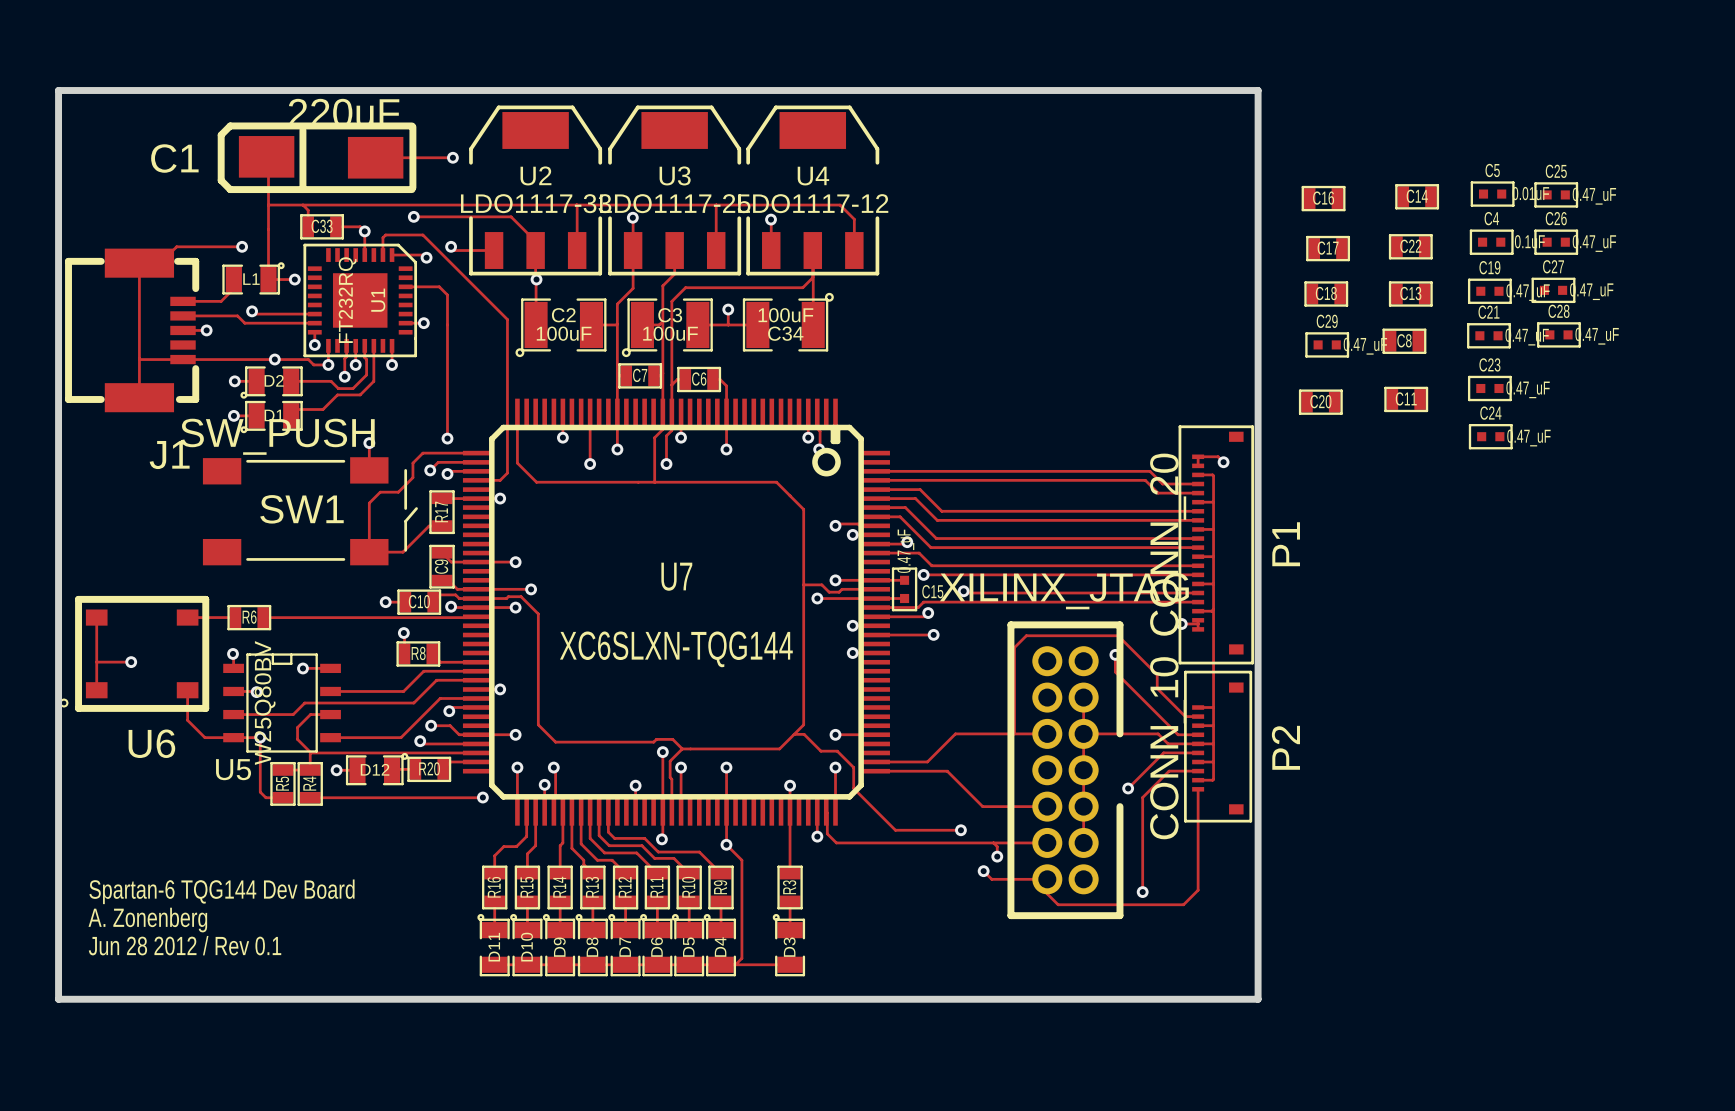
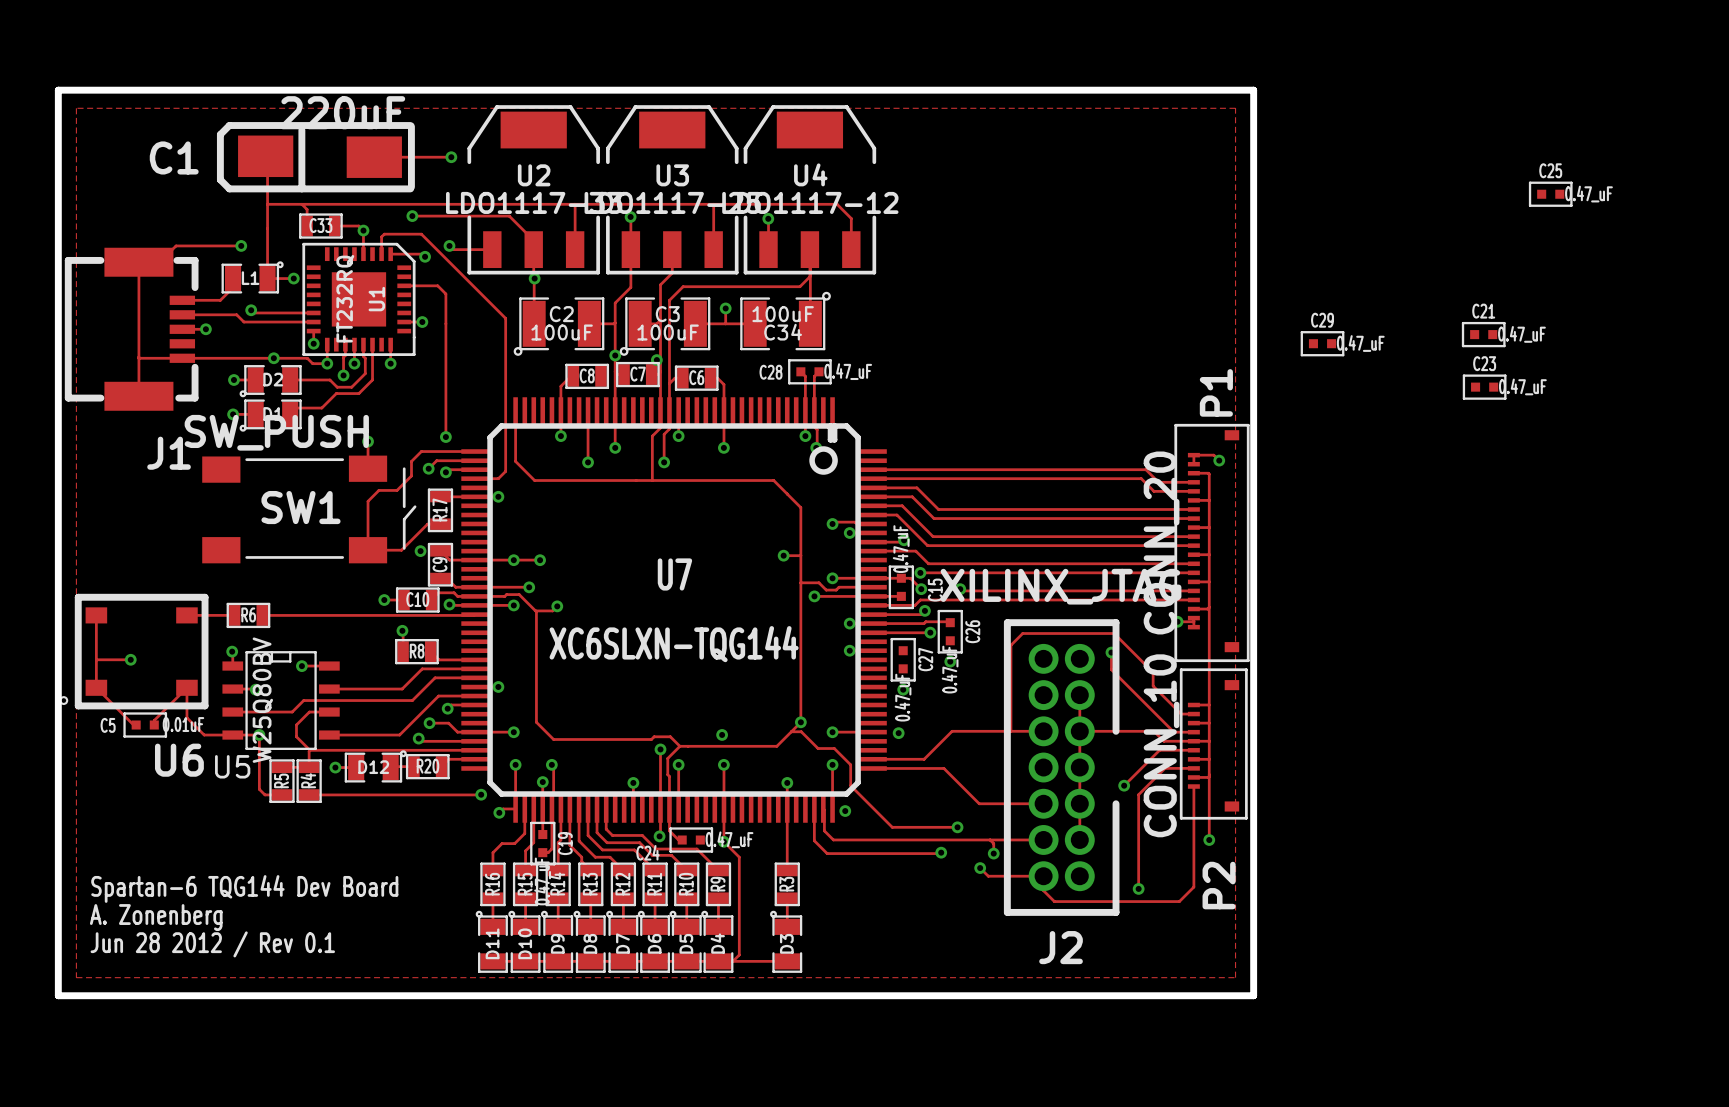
zone outline: none -> (76, 108) (1235, 108) (1235, 977) (76, 977) (76, 108)
C5 name position: C5 (1492, 170) -> C5 (108, 725)
C5 position: (1492, 194) -> (145, 725)
C14: (1417, 196) -> none
C16: (1323, 198) -> none
C4: 0.1uF (1491, 242) -> none
C26 rotation: 0° (1556, 242) -> 90° clockwise (950, 631)
C26 position: (1556, 242) -> (950, 631)
C22: (1410, 246) -> none
C17: (1328, 248) -> none
C27 rotation: 0° (1553, 290) -> 90° clockwise (903, 659)
C27 position: (1553, 290) -> (903, 659)
C19 rotation: 0° (1489, 291) -> 90° clockwise (542, 843)
C19 position: (1489, 291) -> (542, 843)
C18: (1326, 294) -> none
C13: (1410, 294) -> none
C28 name position: C28 (1559, 311) -> C28 (771, 372)
C28 position: (1558, 334) -> (809, 371)
C8 position: (1404, 341) -> (587, 376)
via: none -> (615, 355)
via: none -> (656, 360)
track: none -> (800, 371) (805, 376) (805, 411)
track: none -> (818, 371) (814, 376) (814, 411)
track: none -> (573, 376) (570, 376) (560, 386) (560, 411)
C11: (1406, 399) -> none
C20: (1320, 402) -> none
C24 name position: C24 (1490, 413) -> C24 (648, 852)
C24 position: (1490, 436) -> (691, 840)
P1 name position: P1 (1286, 544) -> P1 (1216, 392)
via: none -> (420, 551)
track: none -> (783, 555) (800, 555)
via: none -> (783, 555)
track: none -> (513, 560) (539, 560)
via: none -> (540, 560)
track: none -> (901, 578) (910, 578) (921, 589)
via: none -> (921, 589)
C15 name rotation: 0° (932, 591) -> 90° counterclockwise (935, 590)
track: none -> (557, 606) (552, 610) (535, 610)
via: none -> (557, 606)
track: none -> (950, 622) (873, 623)
via: none -> (950, 661)
track: none -> (96, 687) (133, 725) (136, 725)
track: none -> (186, 687) (154, 720) (154, 725)
via: none -> (903, 689)
via: none -> (800, 722)
via: none -> (898, 733)
via: none -> (722, 734)
U6 name position: U6 (151, 743) -> U6 (179, 760)
P2 name position: P2 (1285, 747) -> P2 (1219, 885)
track: none -> (1209, 776) (1209, 840)
track: none -> (515, 808) (503, 808) (499, 812)
track: none -> (551, 808) (551, 848) (548, 852) (542, 852)
track: none -> (669, 808) (669, 830) (678, 840) (682, 840)
via: none -> (499, 812)
track: none -> (814, 833) (814, 840) (827, 853) (941, 852)
via position: (817, 836) -> (845, 811)
via: none -> (1209, 840)
via: none -> (941, 852)
J2 name: none -> J2 (1061, 947)

